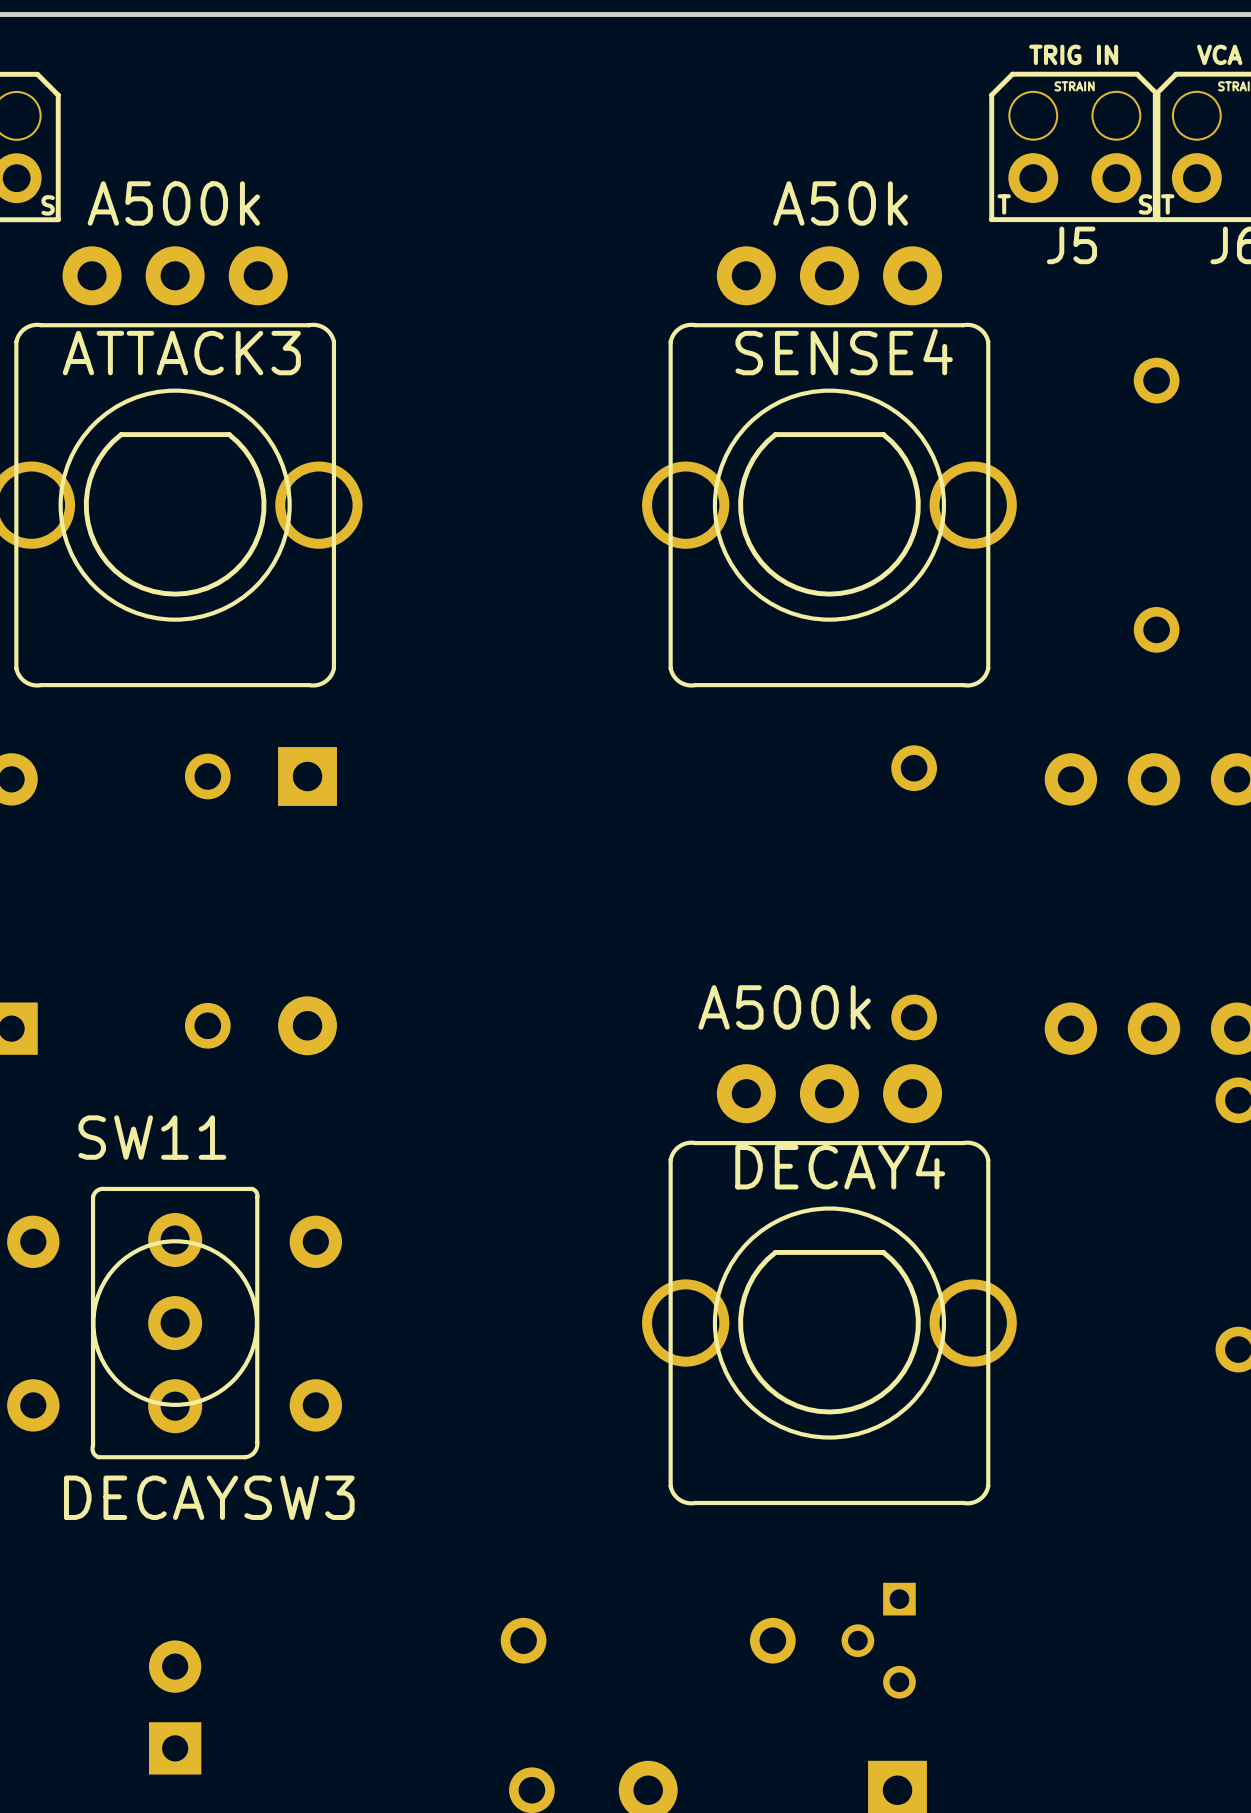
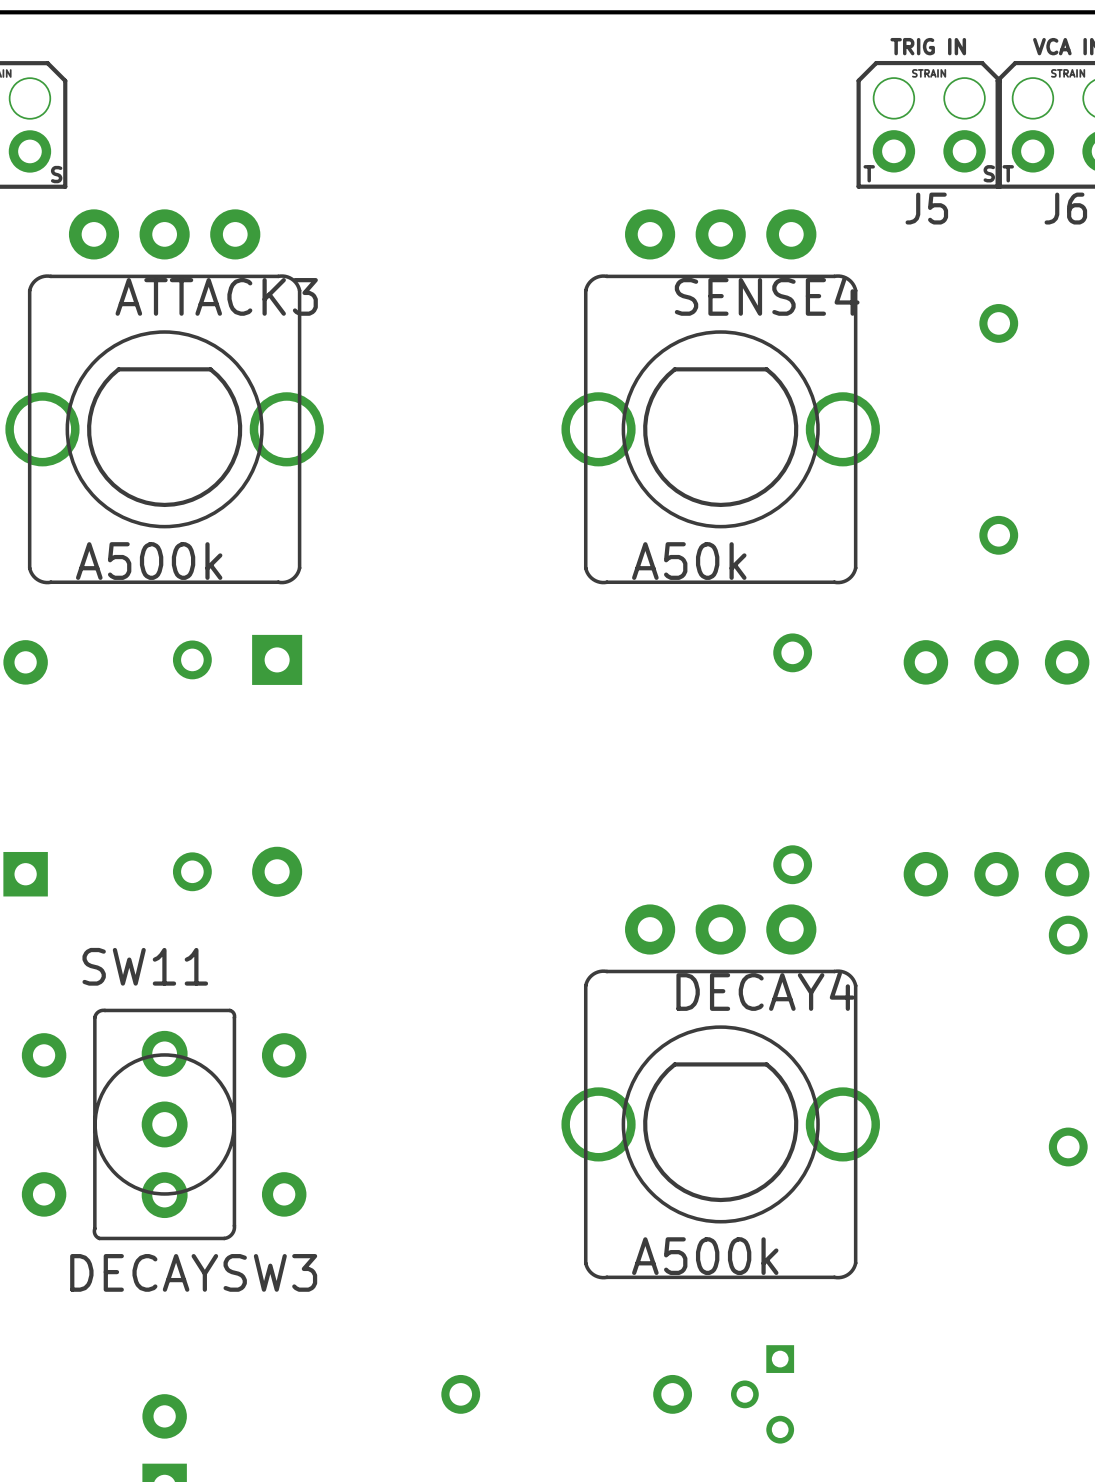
ATTACK3 value position: A500k (173, 203) -> A500k (149, 561)
SENSE4 value position: A50k (840, 203) -> A50k (689, 561)
SENSE4 name position: SENSE4 (844, 352) -> SENSE4 (767, 296)
ATTACK3 name position: ATTACK3 (181, 353) -> ATTACK3 (216, 296)
DECAY4 value position: A500k (784, 1007) -> A500k (705, 1256)
DECAY4 name position: DECAY4 (840, 1166) -> DECAY4 (765, 991)

